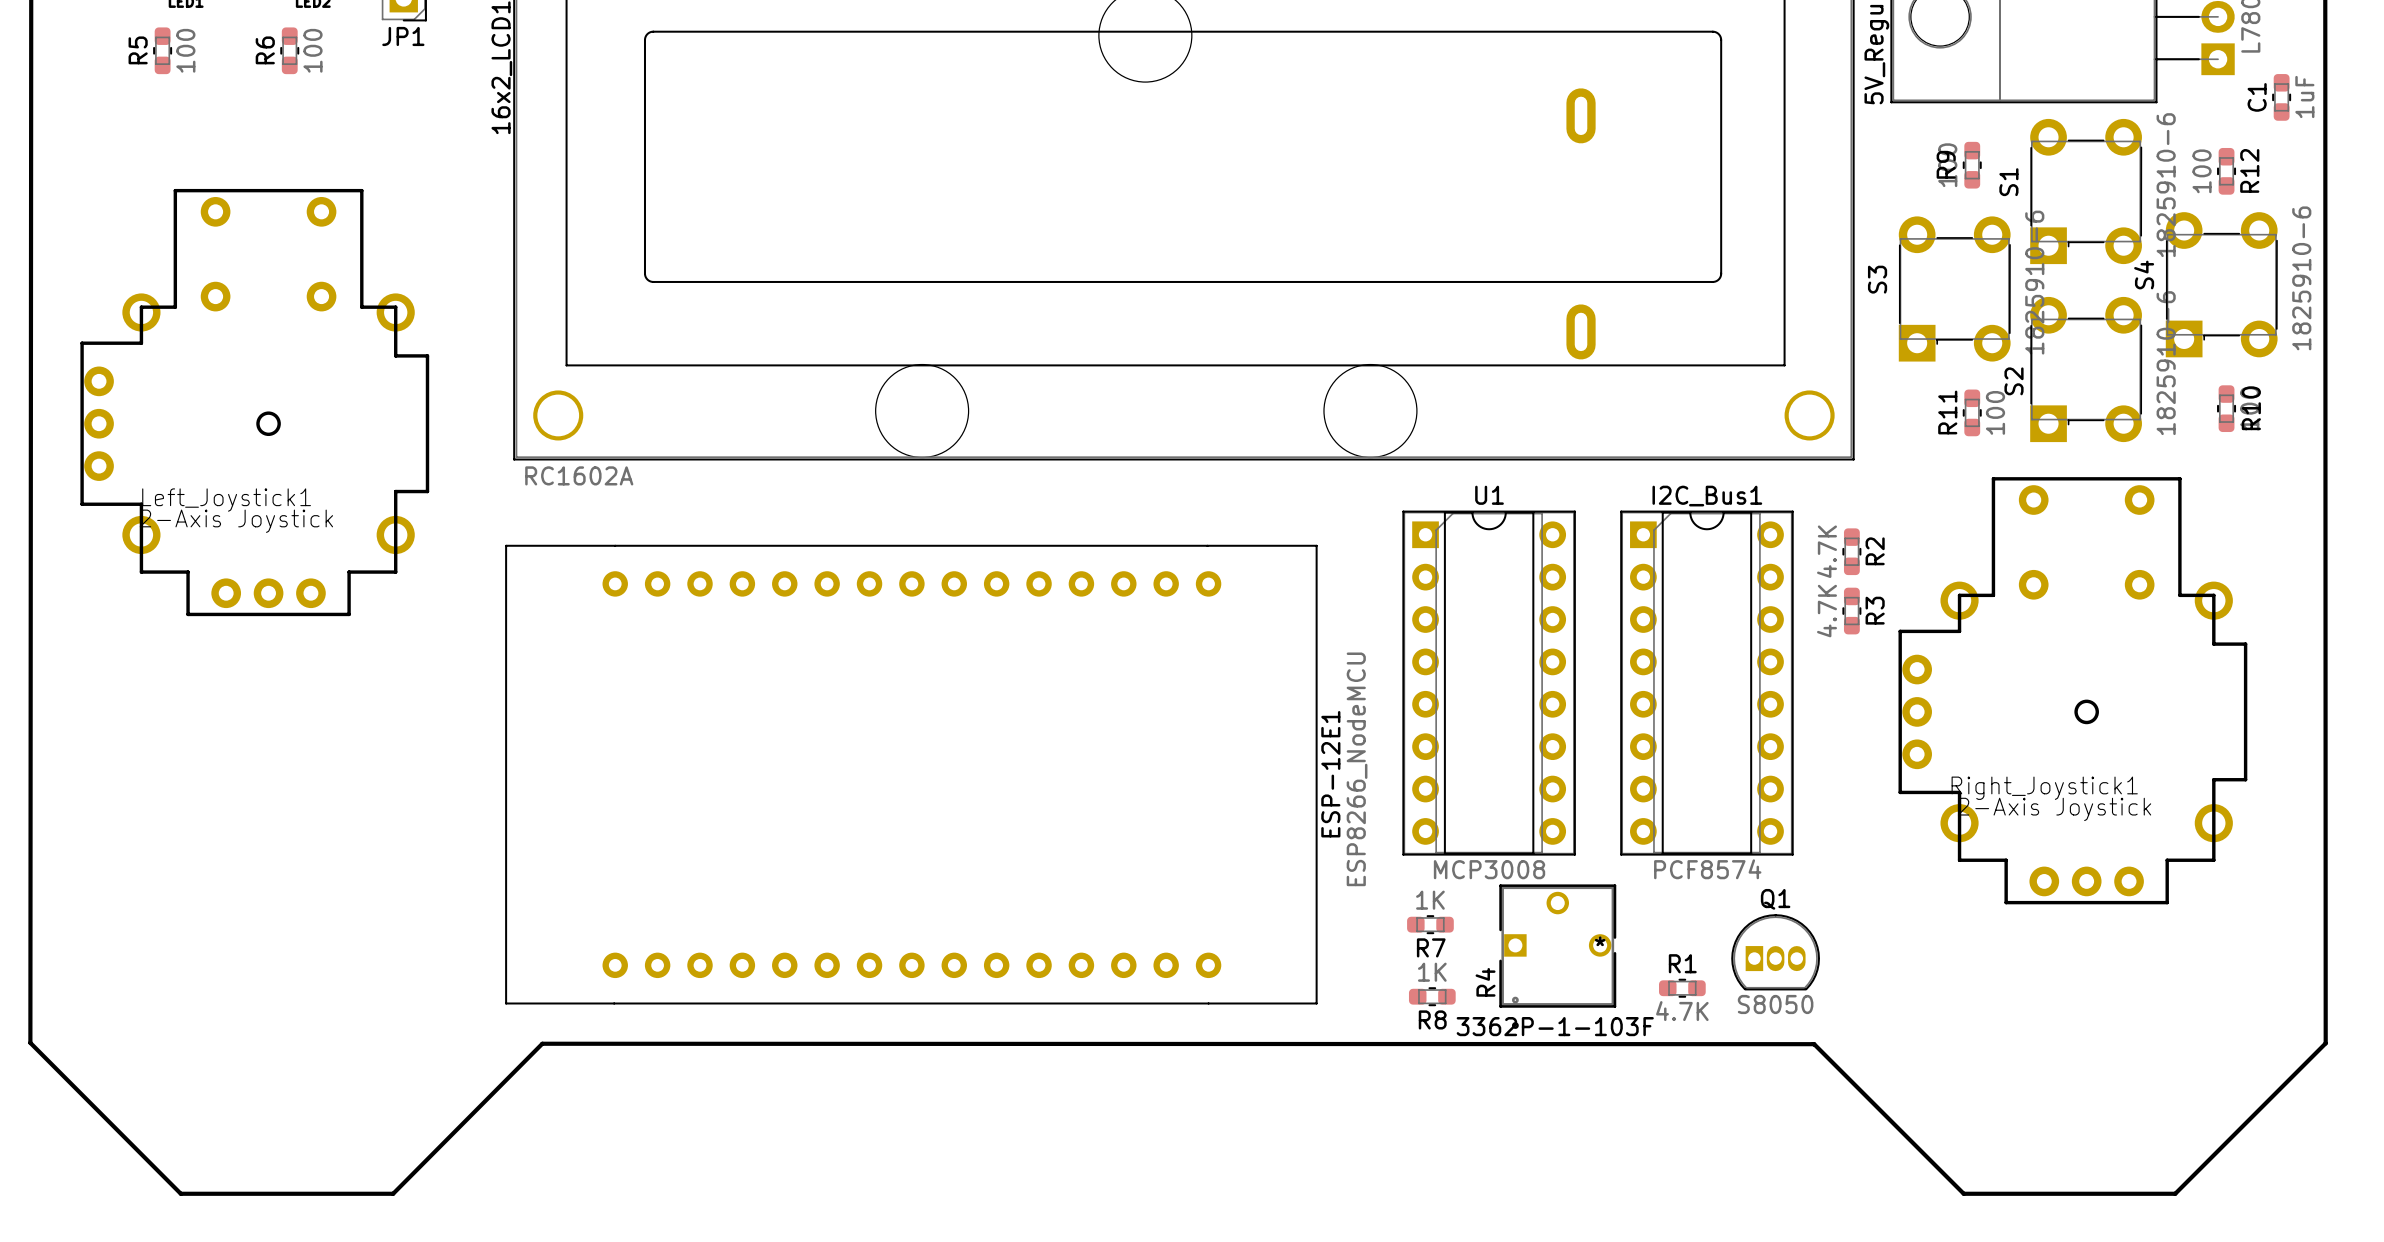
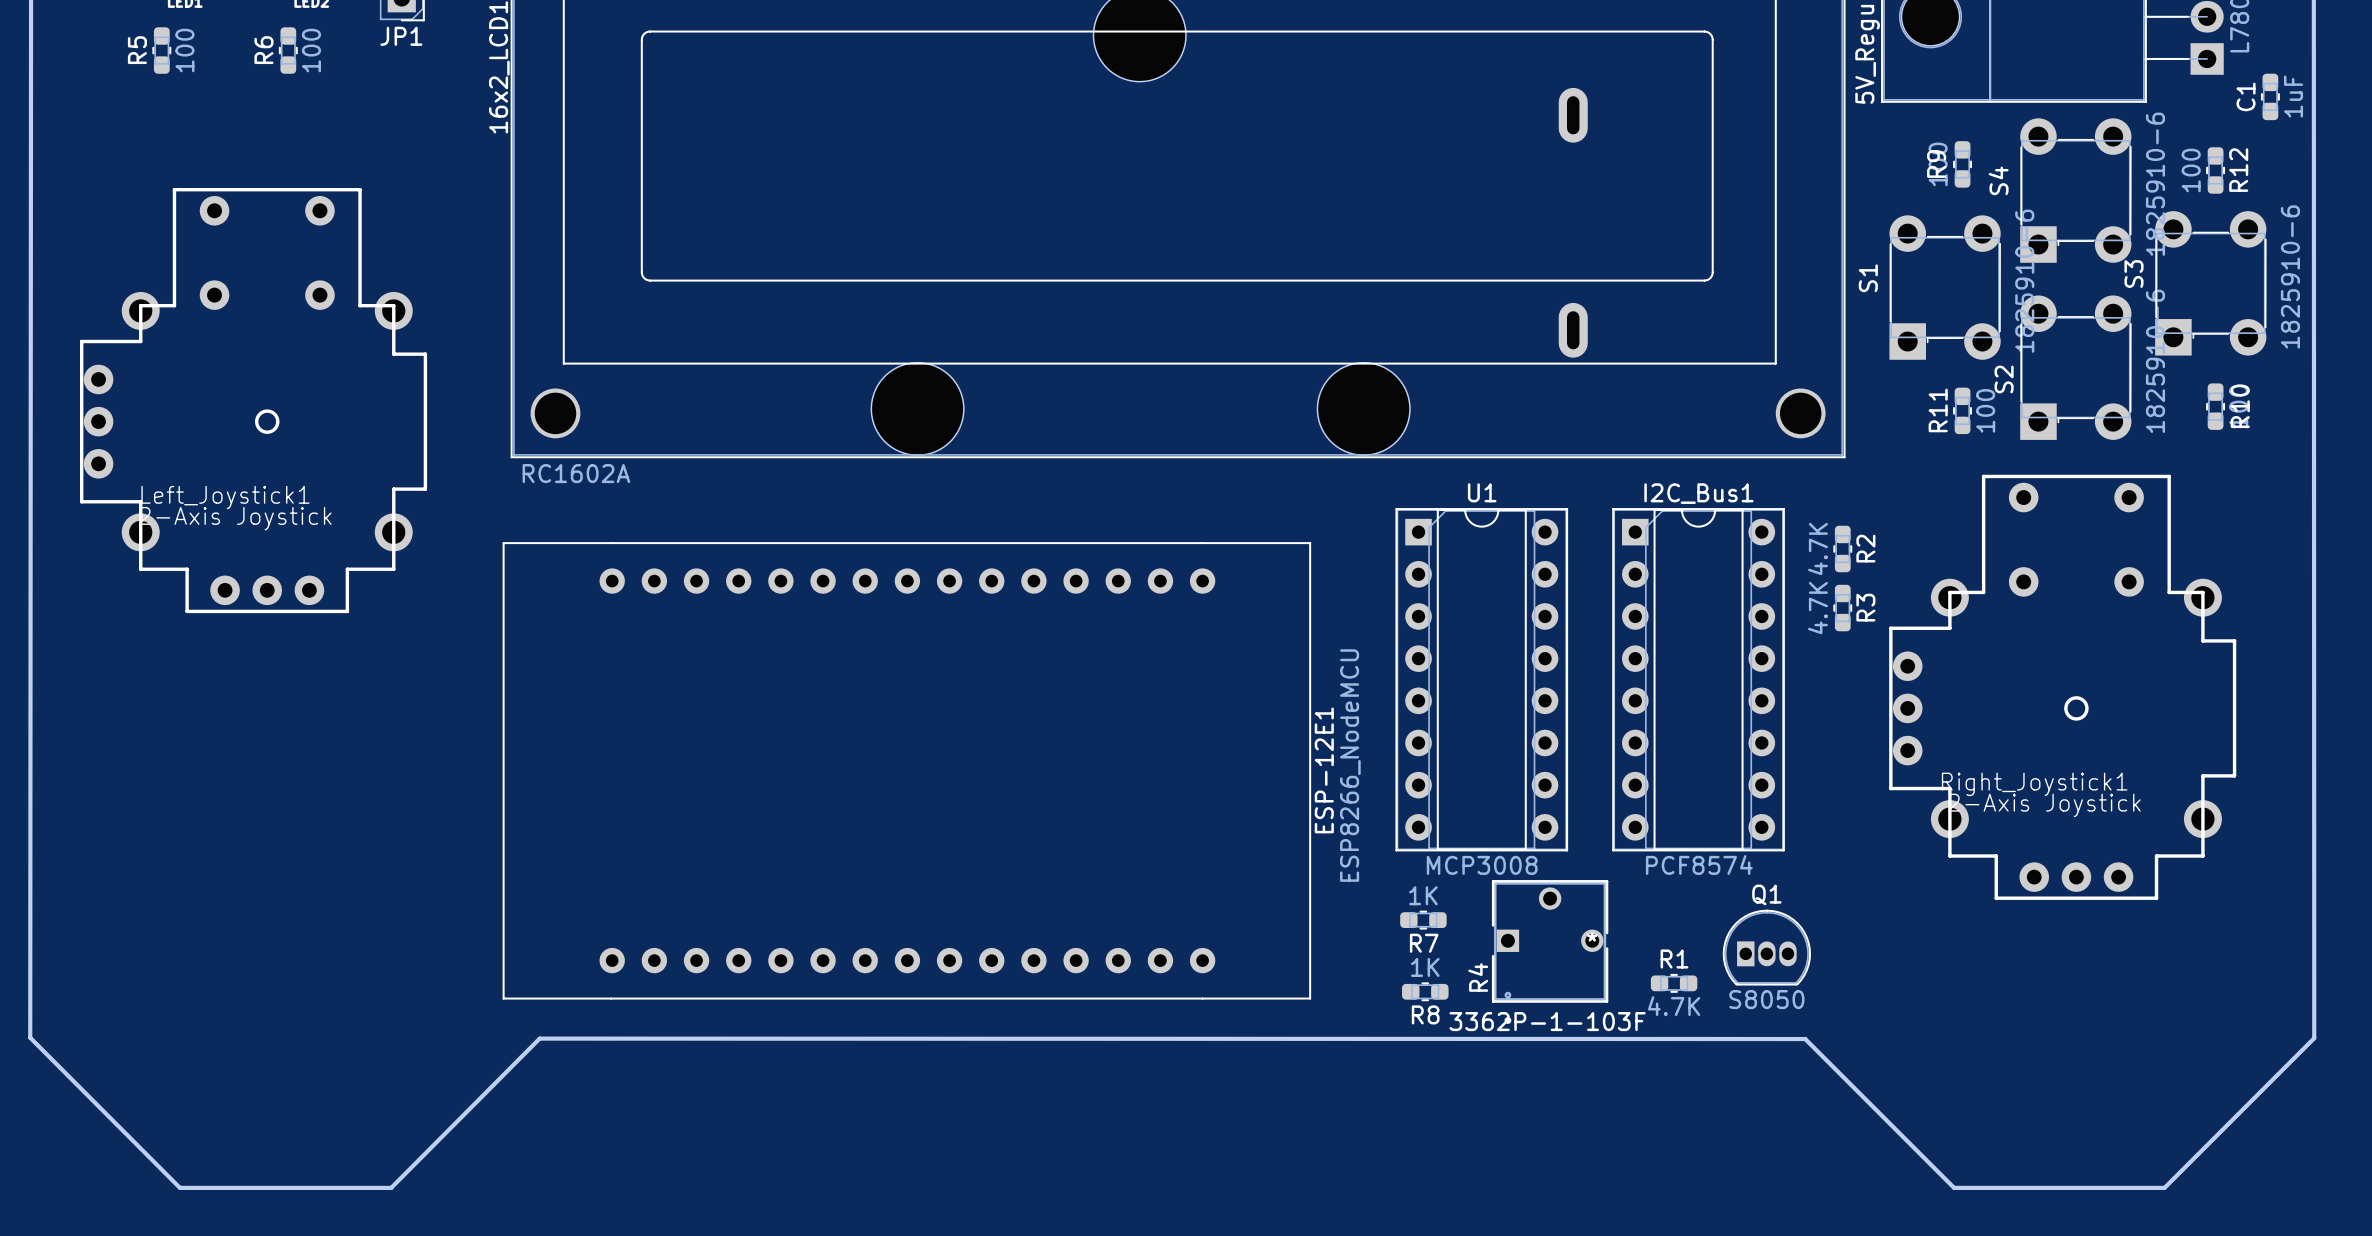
S1 name: S1 (2008, 182) -> S4 (1998, 180)
S4 name: S4 (2144, 275) -> S3 (2133, 274)
S3 name: S3 (1877, 279) -> S1 (1868, 278)

